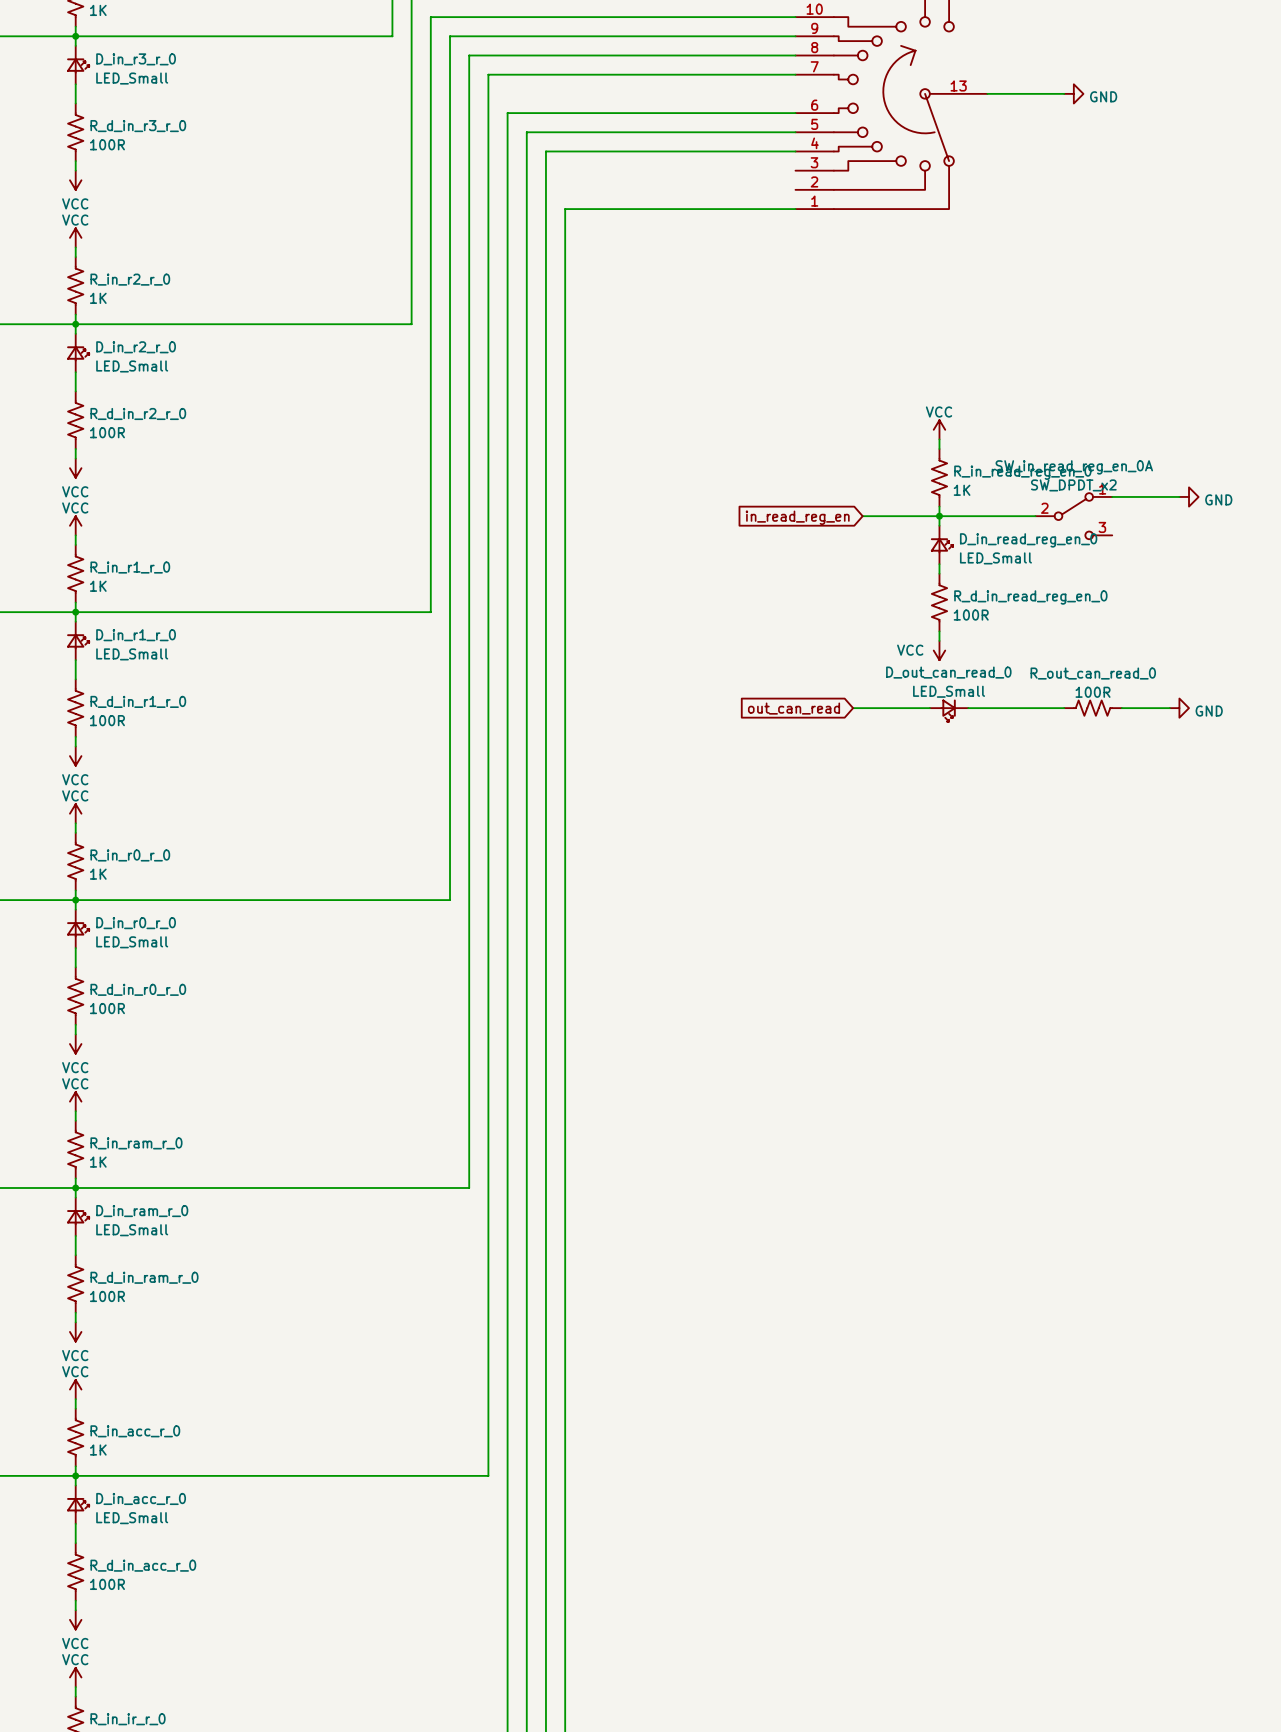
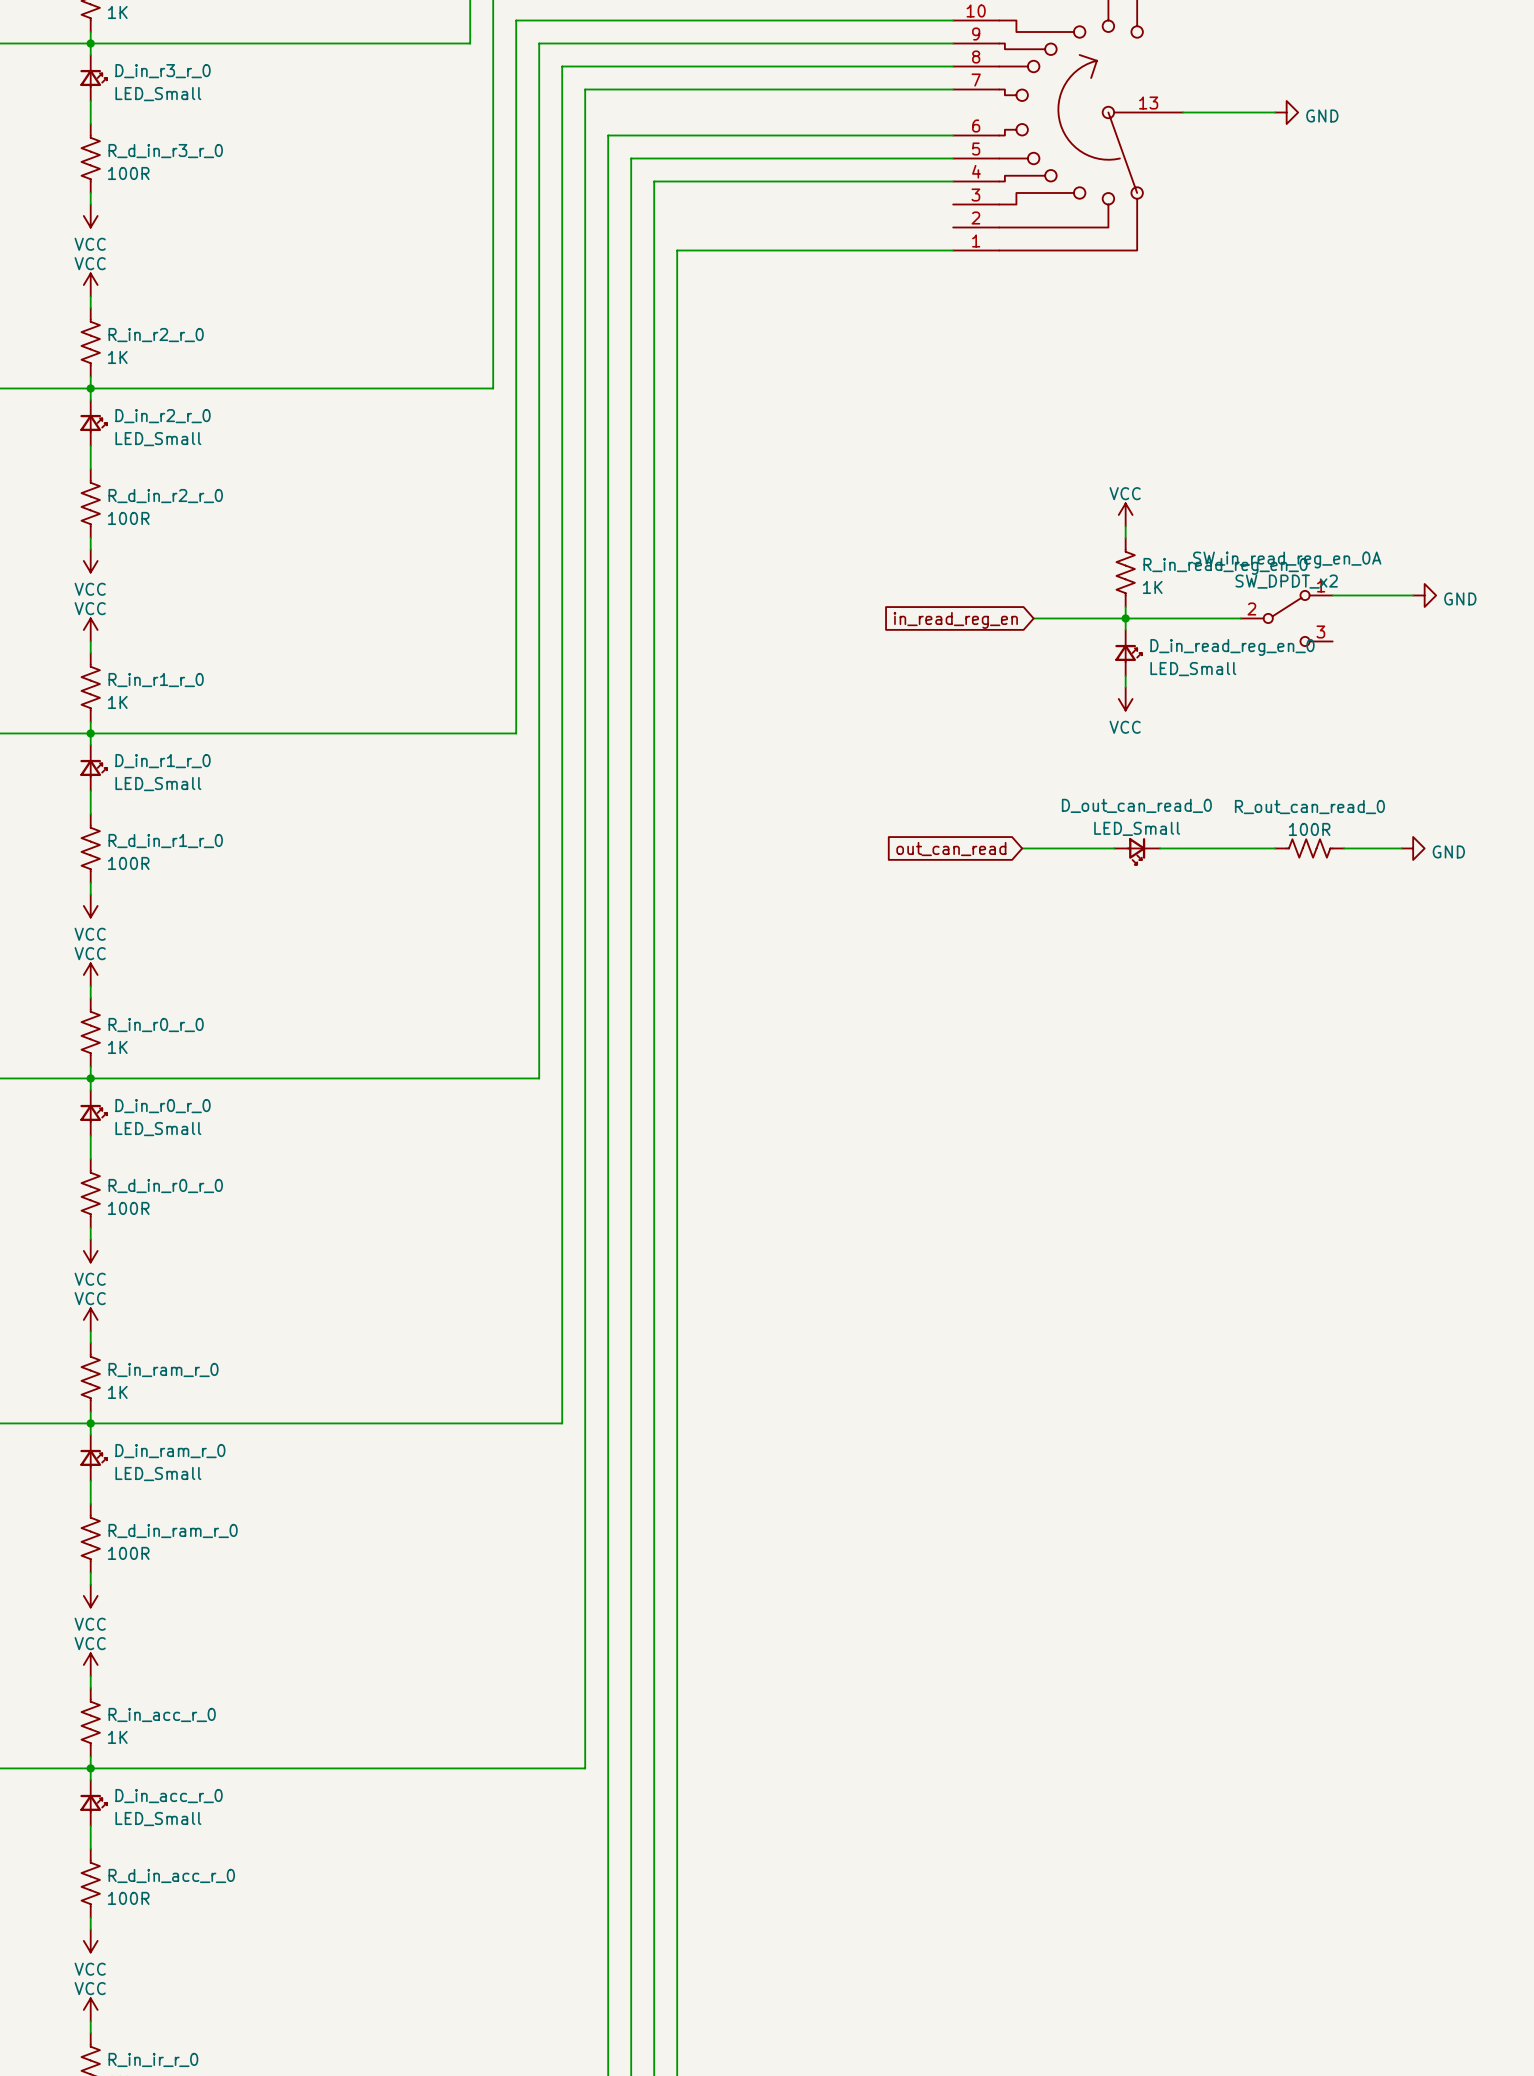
R_d_in_read_reg_en_0: 100R (939, 602) -> none
wire: (939, 631) (939, 640) -> none
power symbol text position: VCC (910, 650) -> VCC (1125, 727)
power symbol position: VCC (939, 650) -> VCC (1125, 698)

